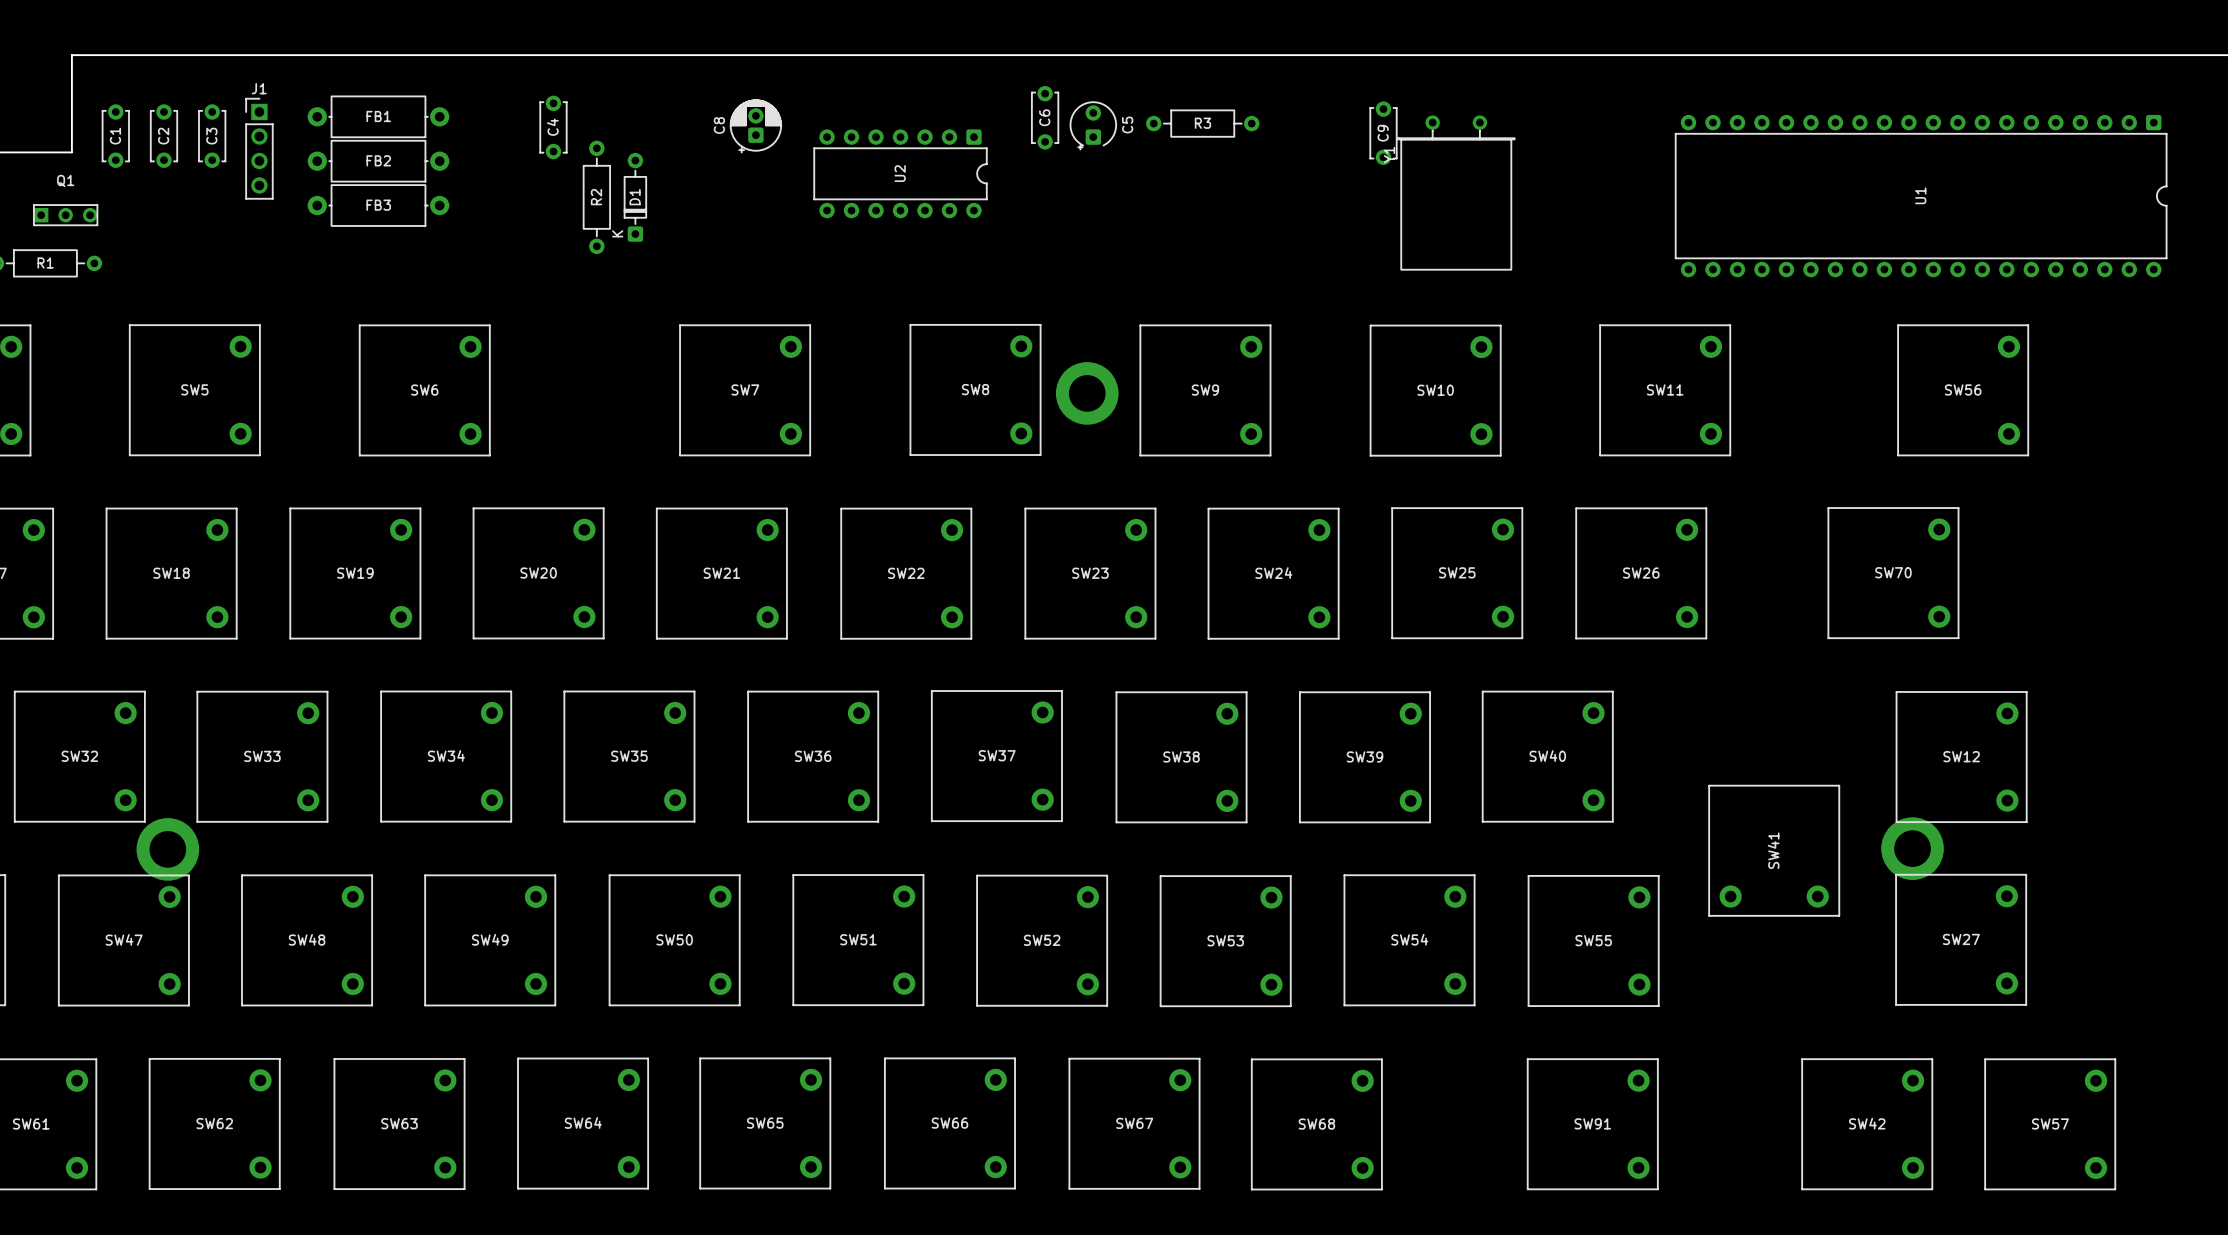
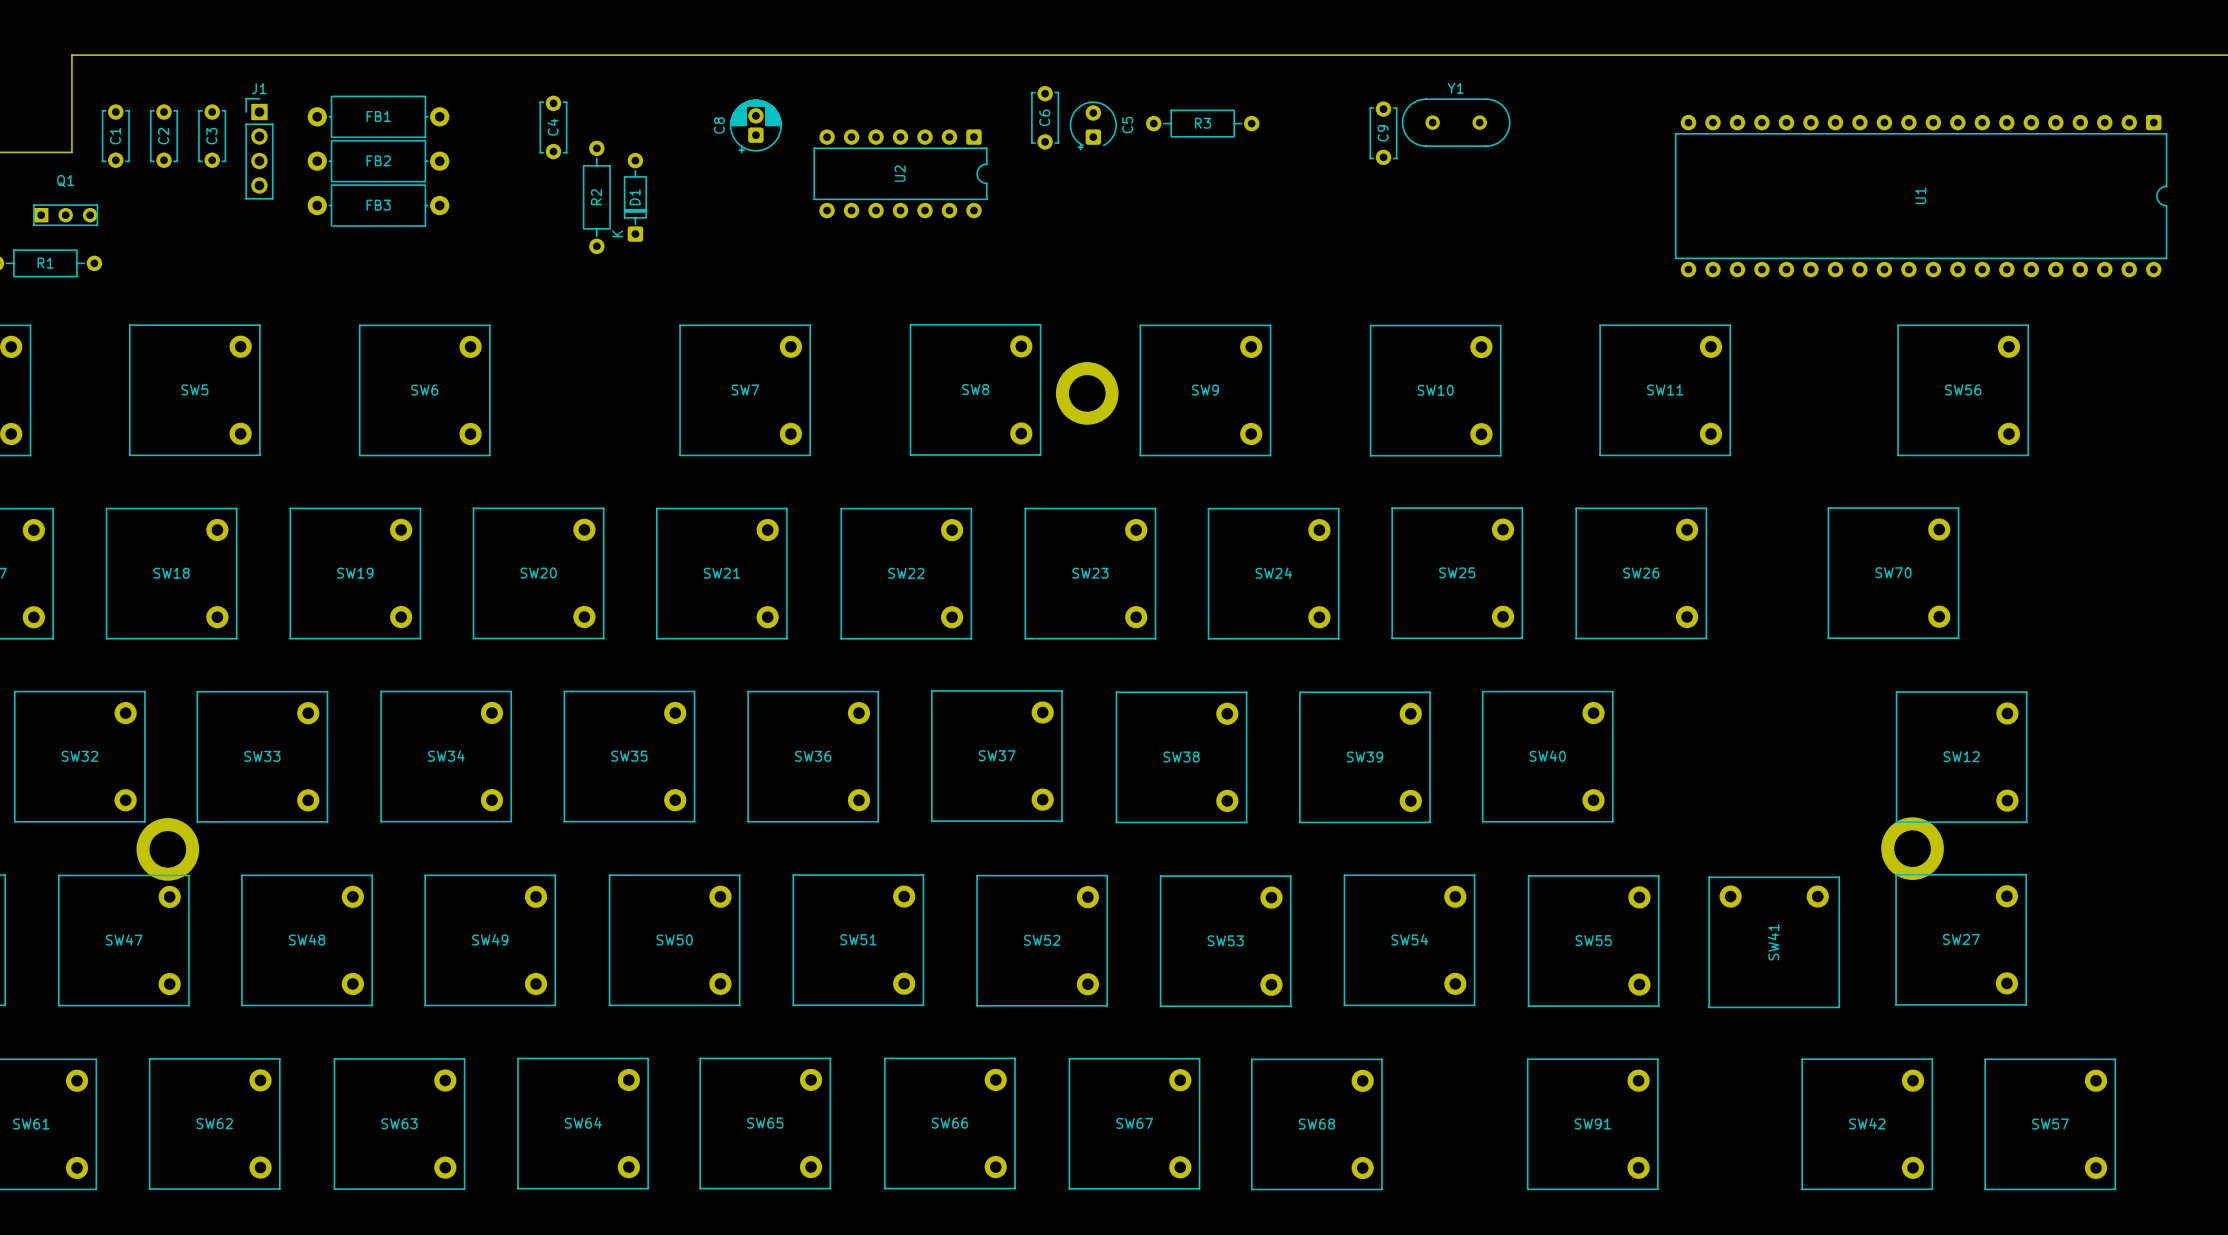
Y1 footprint: [1397, 115, 1516, 271] -> [1402, 98, 1511, 147]
Y1 name position: Y1 (1389, 155) -> Y1 (1455, 88)
SW41 rotation: 0° (1774, 850) -> 180° (1774, 942)
SW41 position: (1774, 850) -> (1774, 942)

